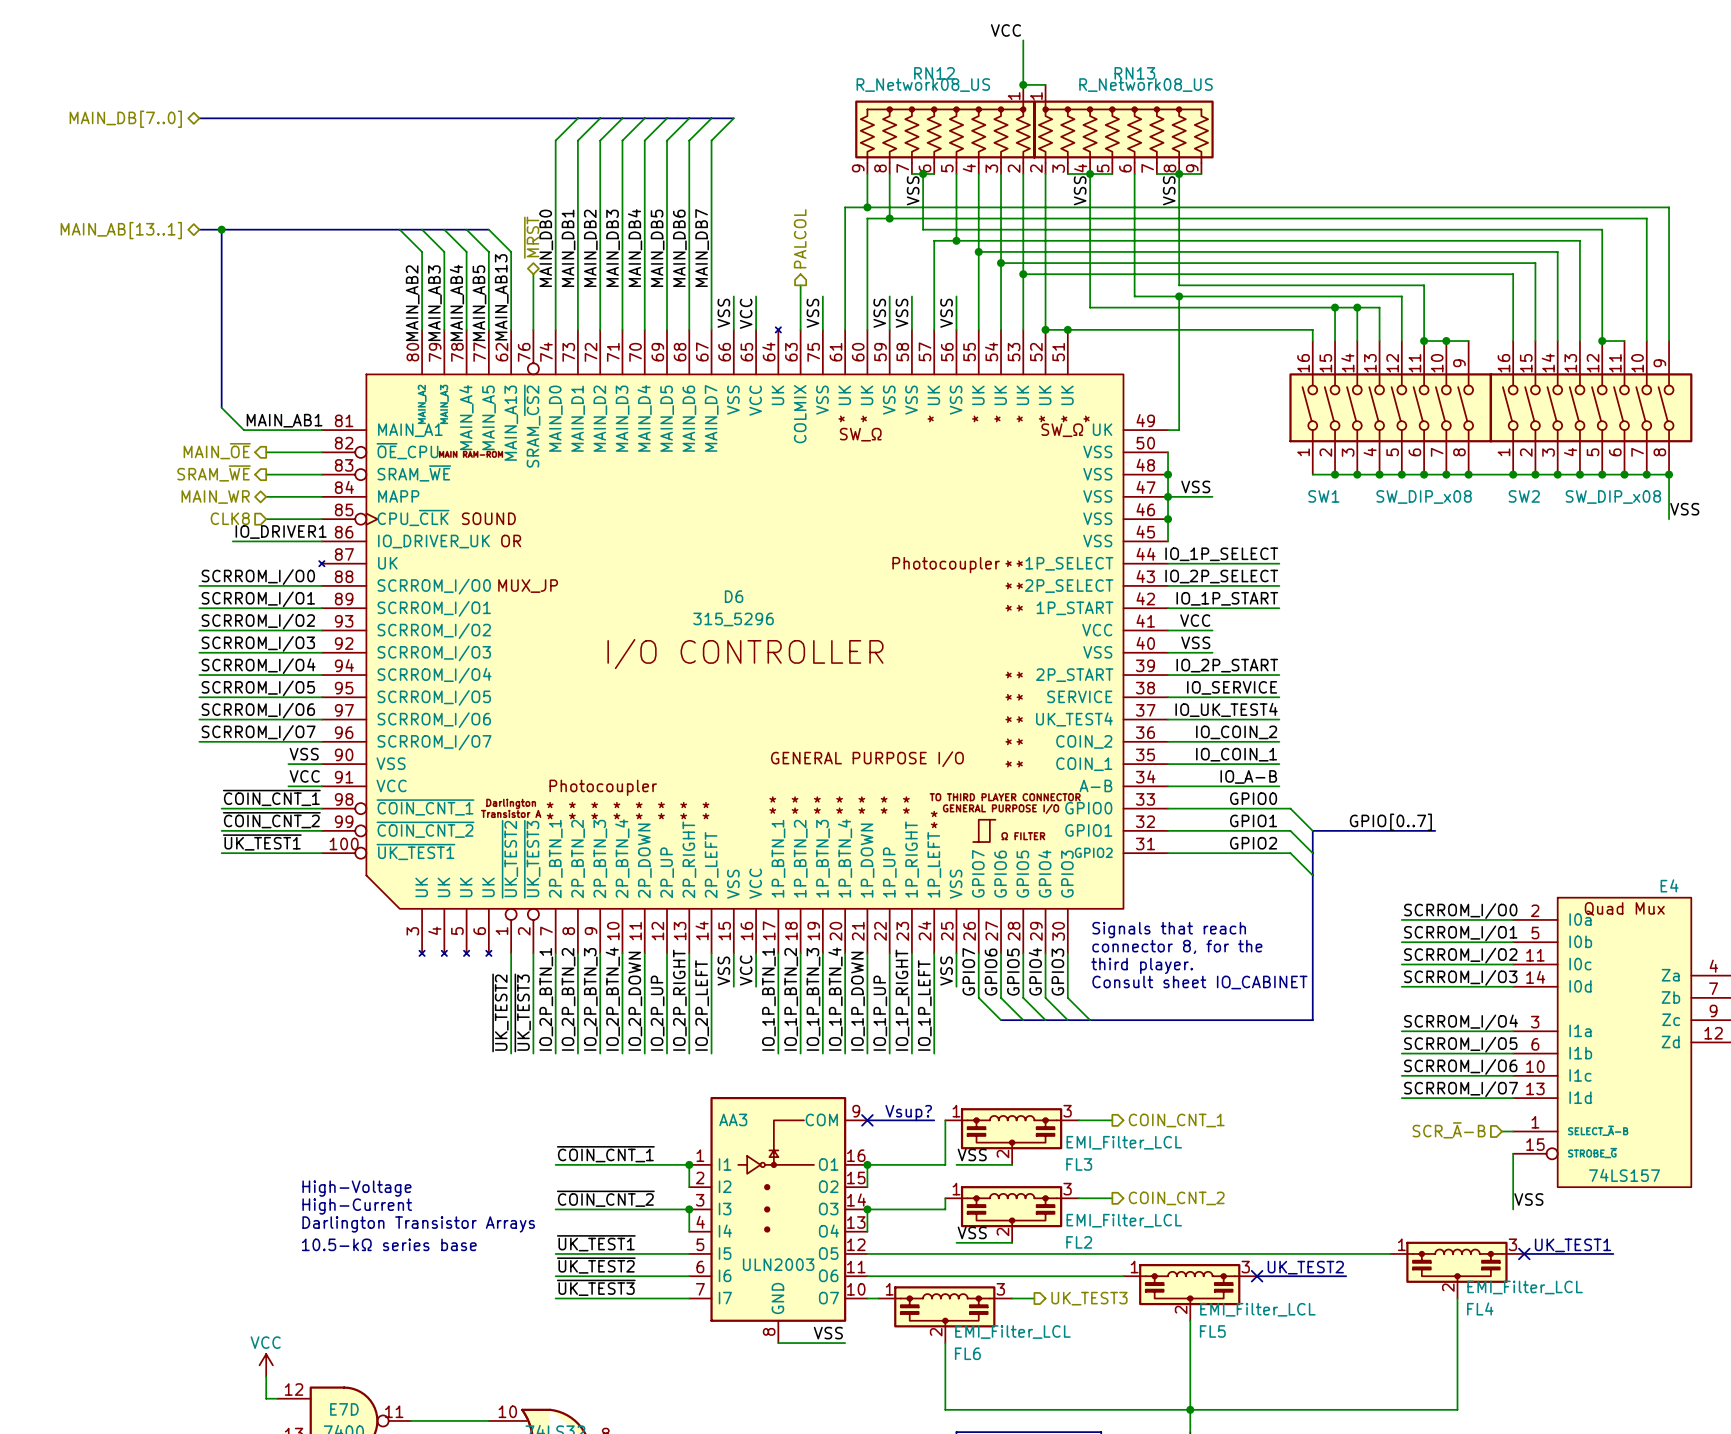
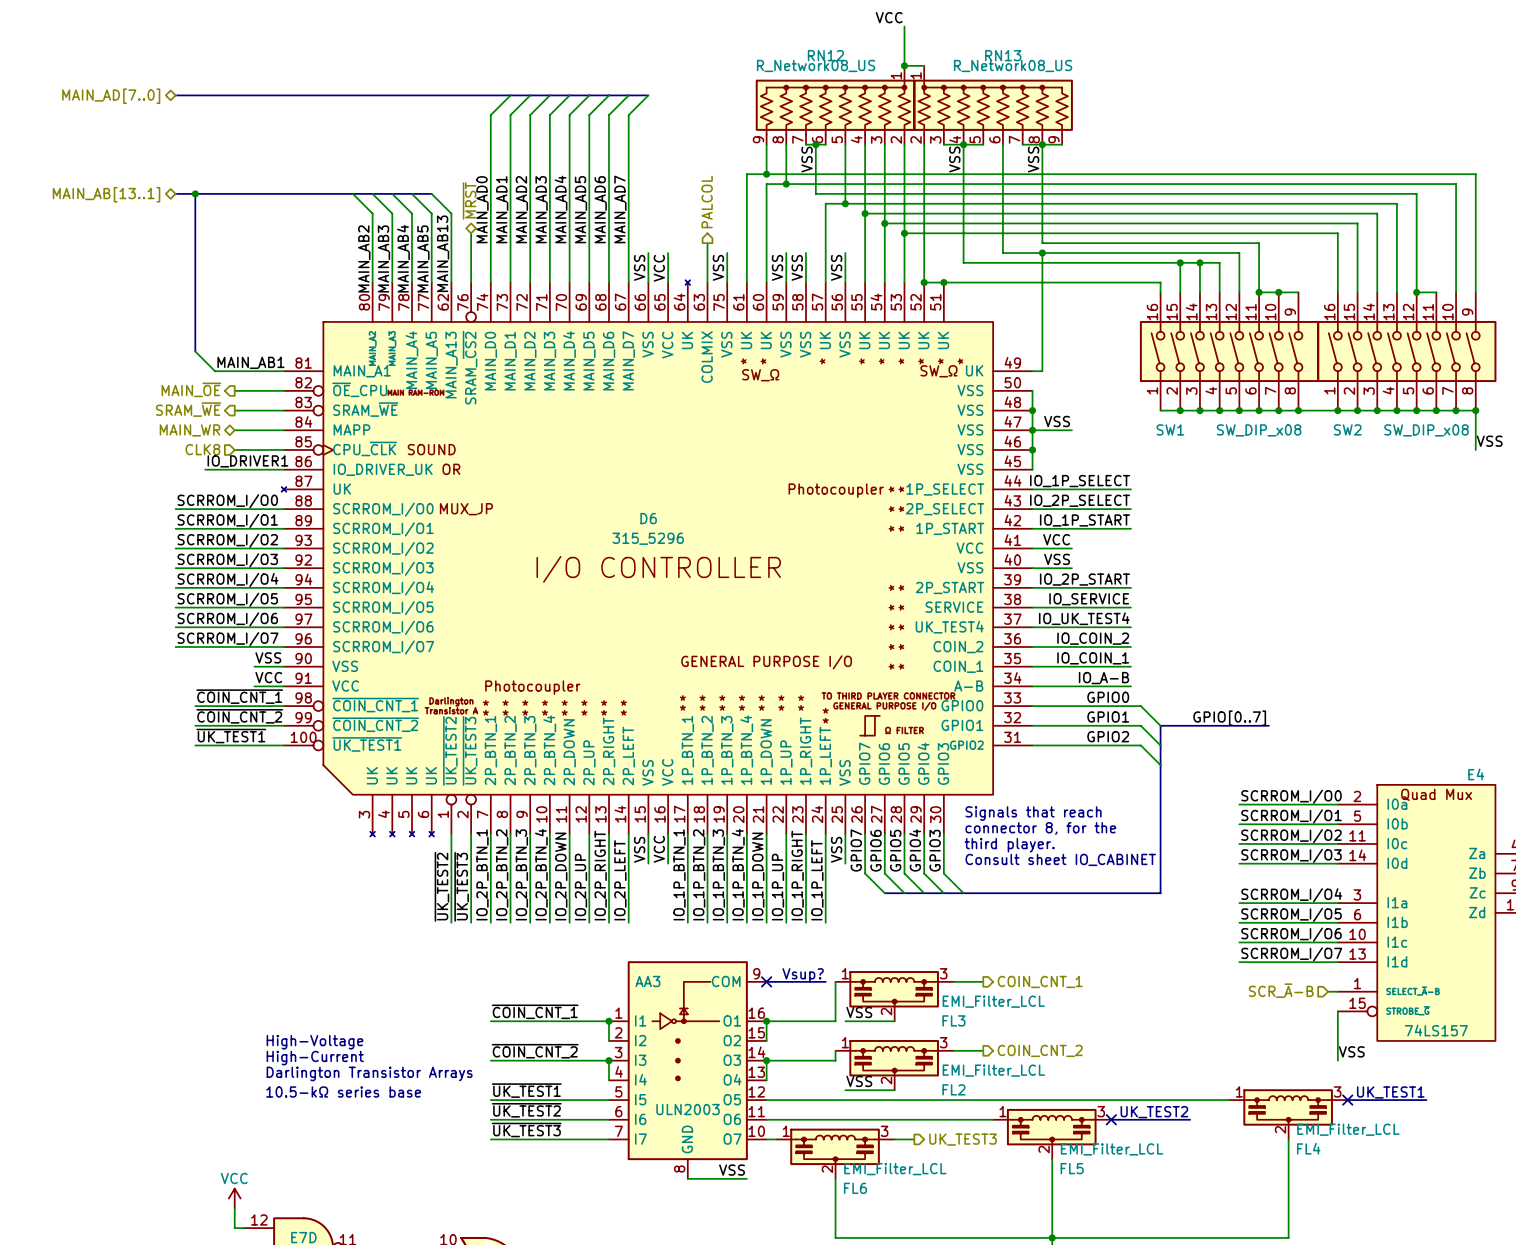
hierarchical label: MAIN_DB[7..0] (125, 119) -> MAIN_AD[7..0] (111, 96)
label: MAIN_DB0 (546, 248) -> MAIN_AD0 (482, 209)
label: MAIN_DB1 (568, 248) -> MAIN_AD1 (502, 209)
label: MAIN_DB2 (590, 248) -> MAIN_AD2 (521, 209)
label: MAIN_DB3 (613, 248) -> MAIN_AD3 (541, 209)
label: MAIN_DB4 (635, 248) -> MAIN_AD4 (561, 209)
label: MAIN_DB5 (657, 248) -> MAIN_AD5 (580, 209)
label: MAIN_DB6 (679, 248) -> MAIN_AD6 (600, 209)
label: MAIN_DB7 (702, 248) -> MAIN_AD7 (620, 209)

